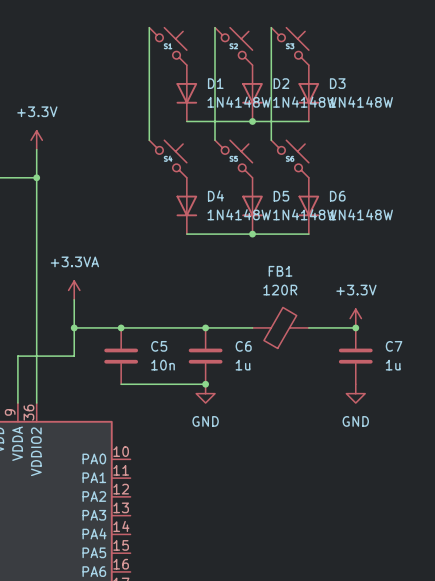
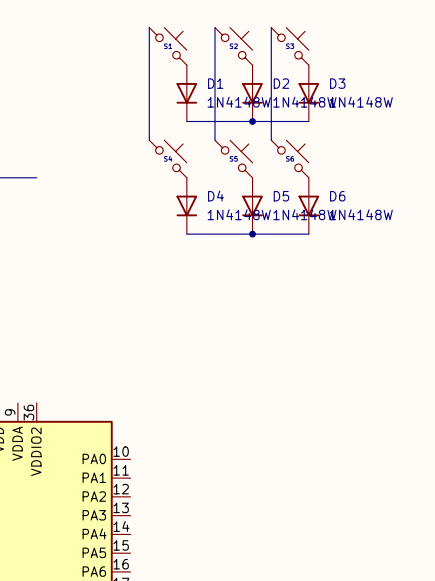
power symbol: +3.3V (36, 140) -> none
wire: (36, 149) (36, 403) -> none
junction: (36, 177) -> none
power symbol: +3.3VA (74, 290) -> none
wire: (74, 299) (74, 356) (17, 356) (17, 403) -> none
power symbol: +3.3V (355, 318) -> none
wire: (74, 327) (252, 327) -> none
junction: (74, 327) -> none
junction: (121, 327) -> none
junction: (205, 327) -> none
FB1: 120R (280, 327) -> none
wire: (308, 327) (355, 327) -> none
junction: (355, 327) -> none
C5: 10n (121, 356) -> none
C6: 1u (205, 356) -> none
C7: 1u (355, 356) -> none
wire: (121, 384) (205, 384) -> none
junction: (205, 384) -> none
power symbol: GND (205, 393) -> none
power symbol: GND (355, 393) -> none

